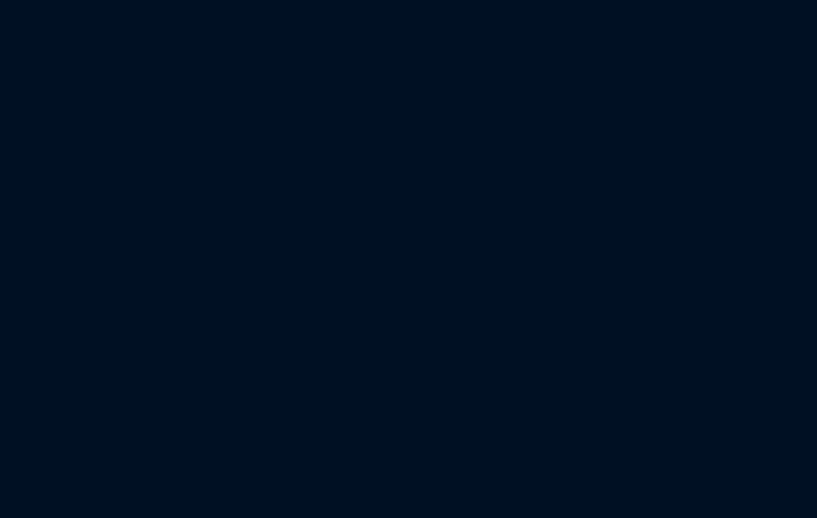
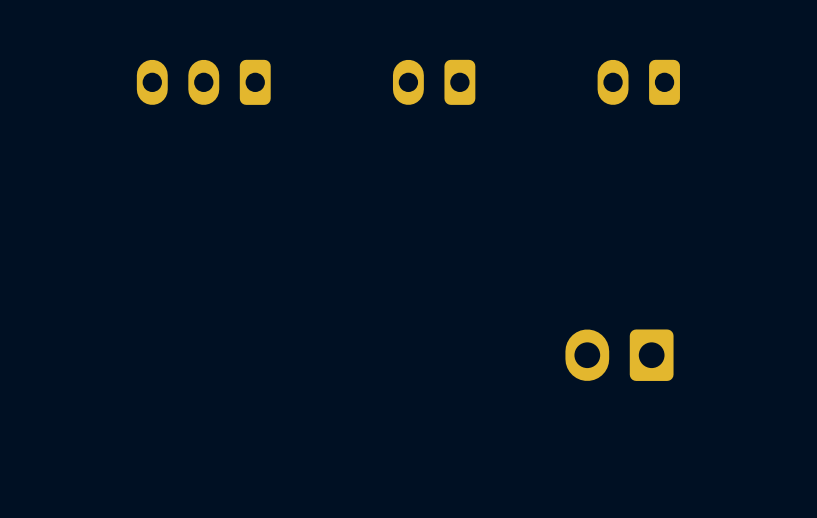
part: none -> (203, 82)
part: none -> (434, 82)
part: none -> (638, 82)
part: none -> (619, 355)

